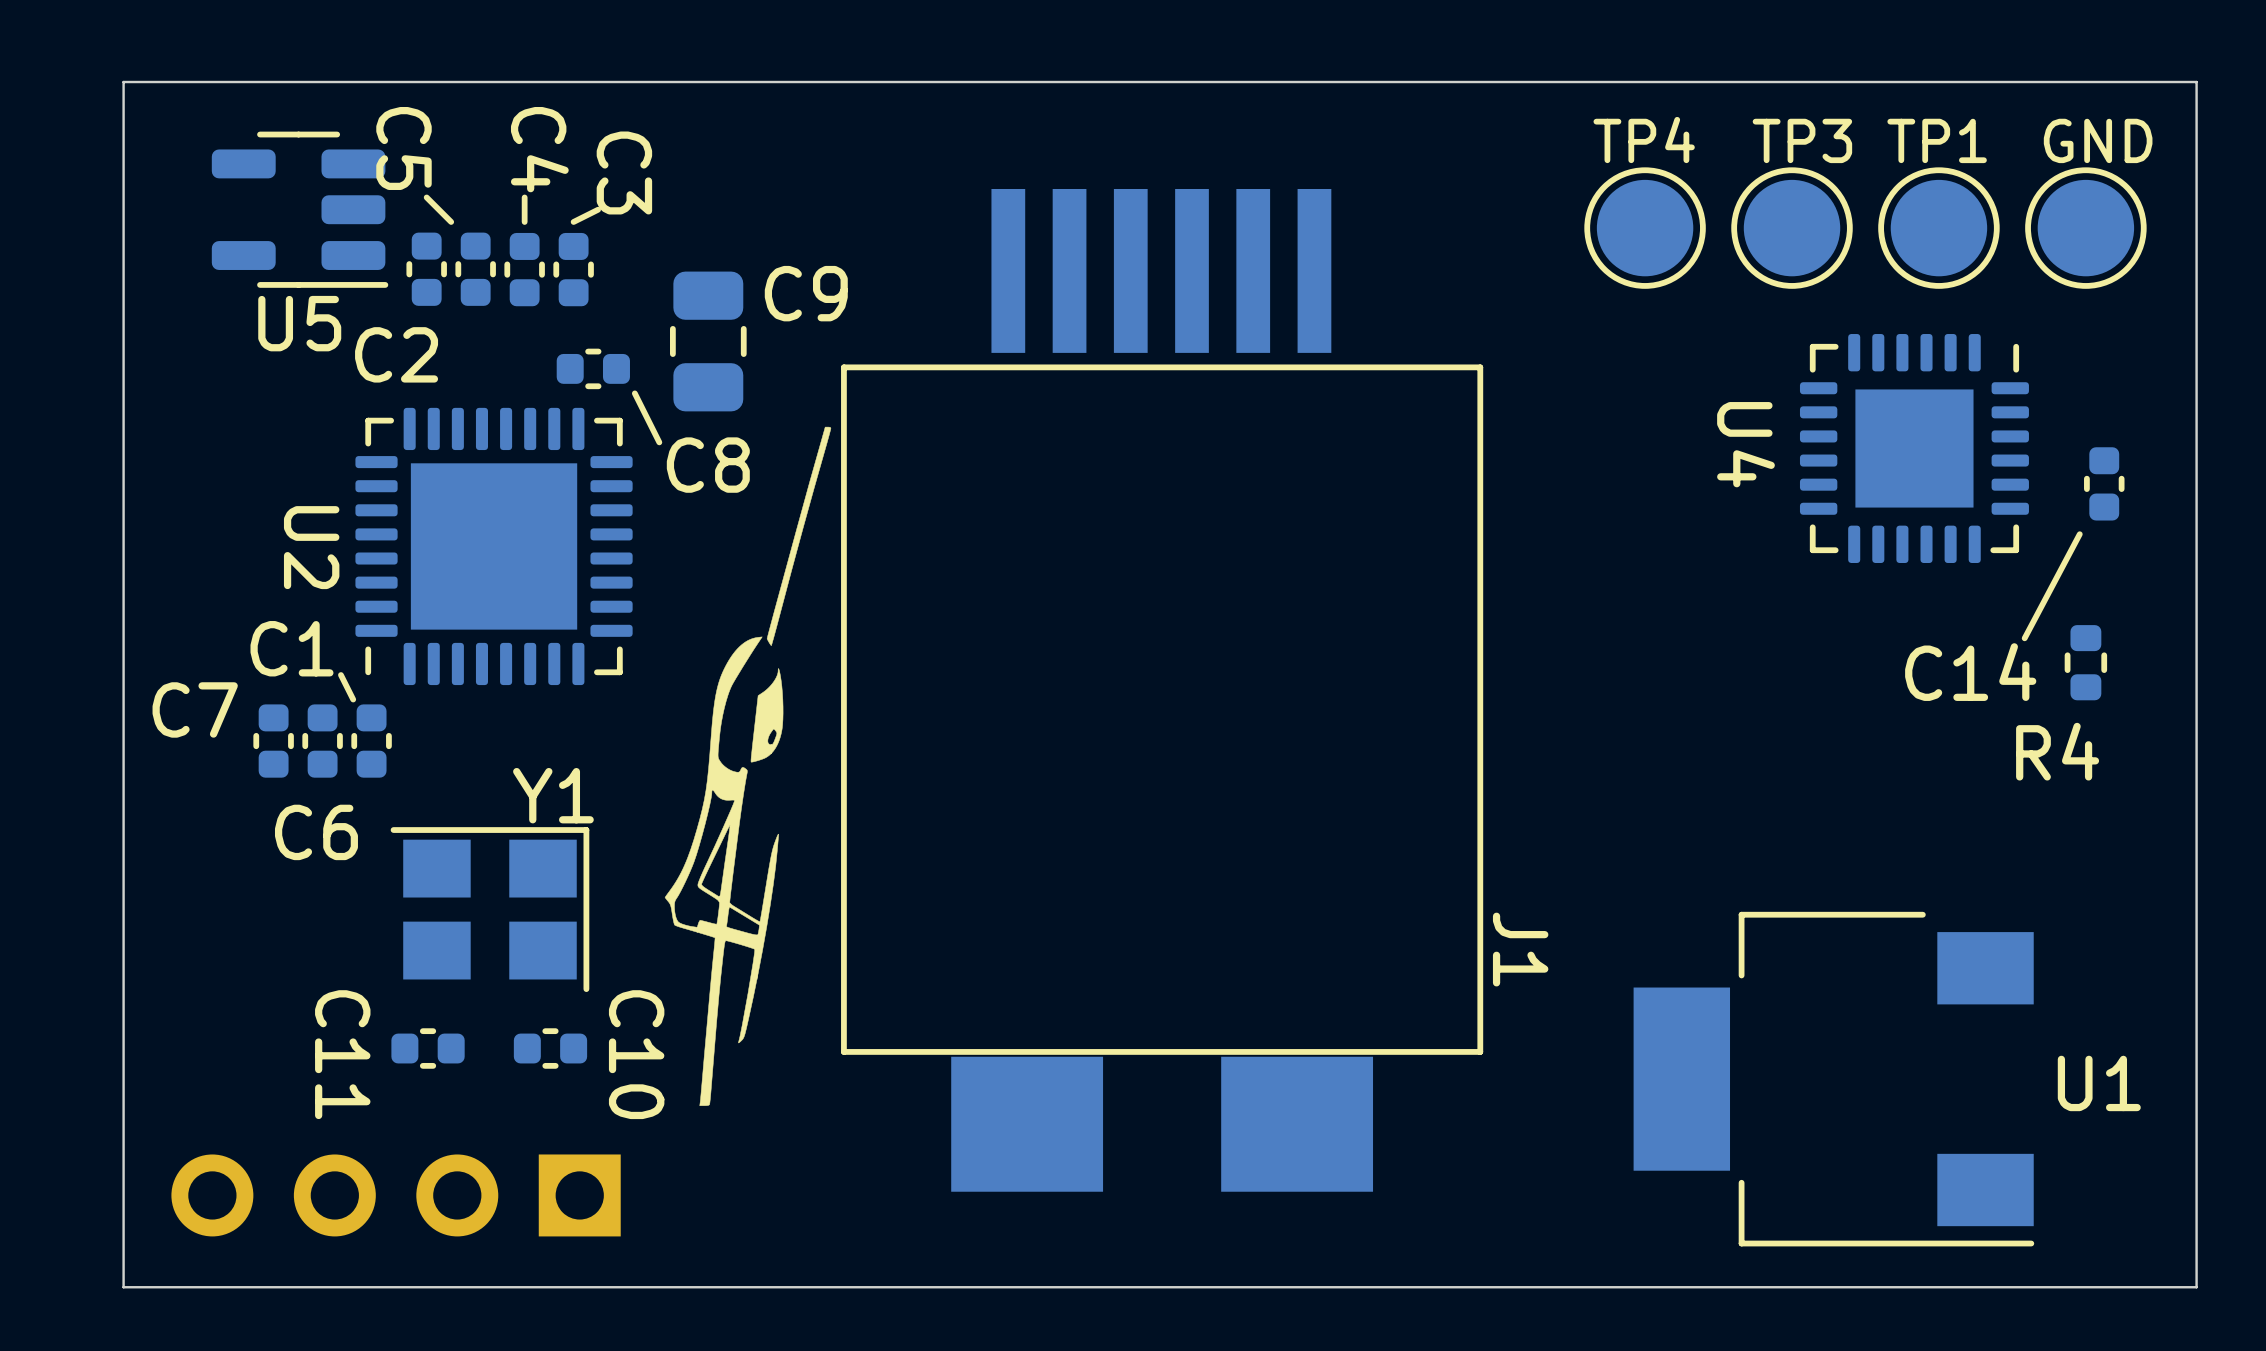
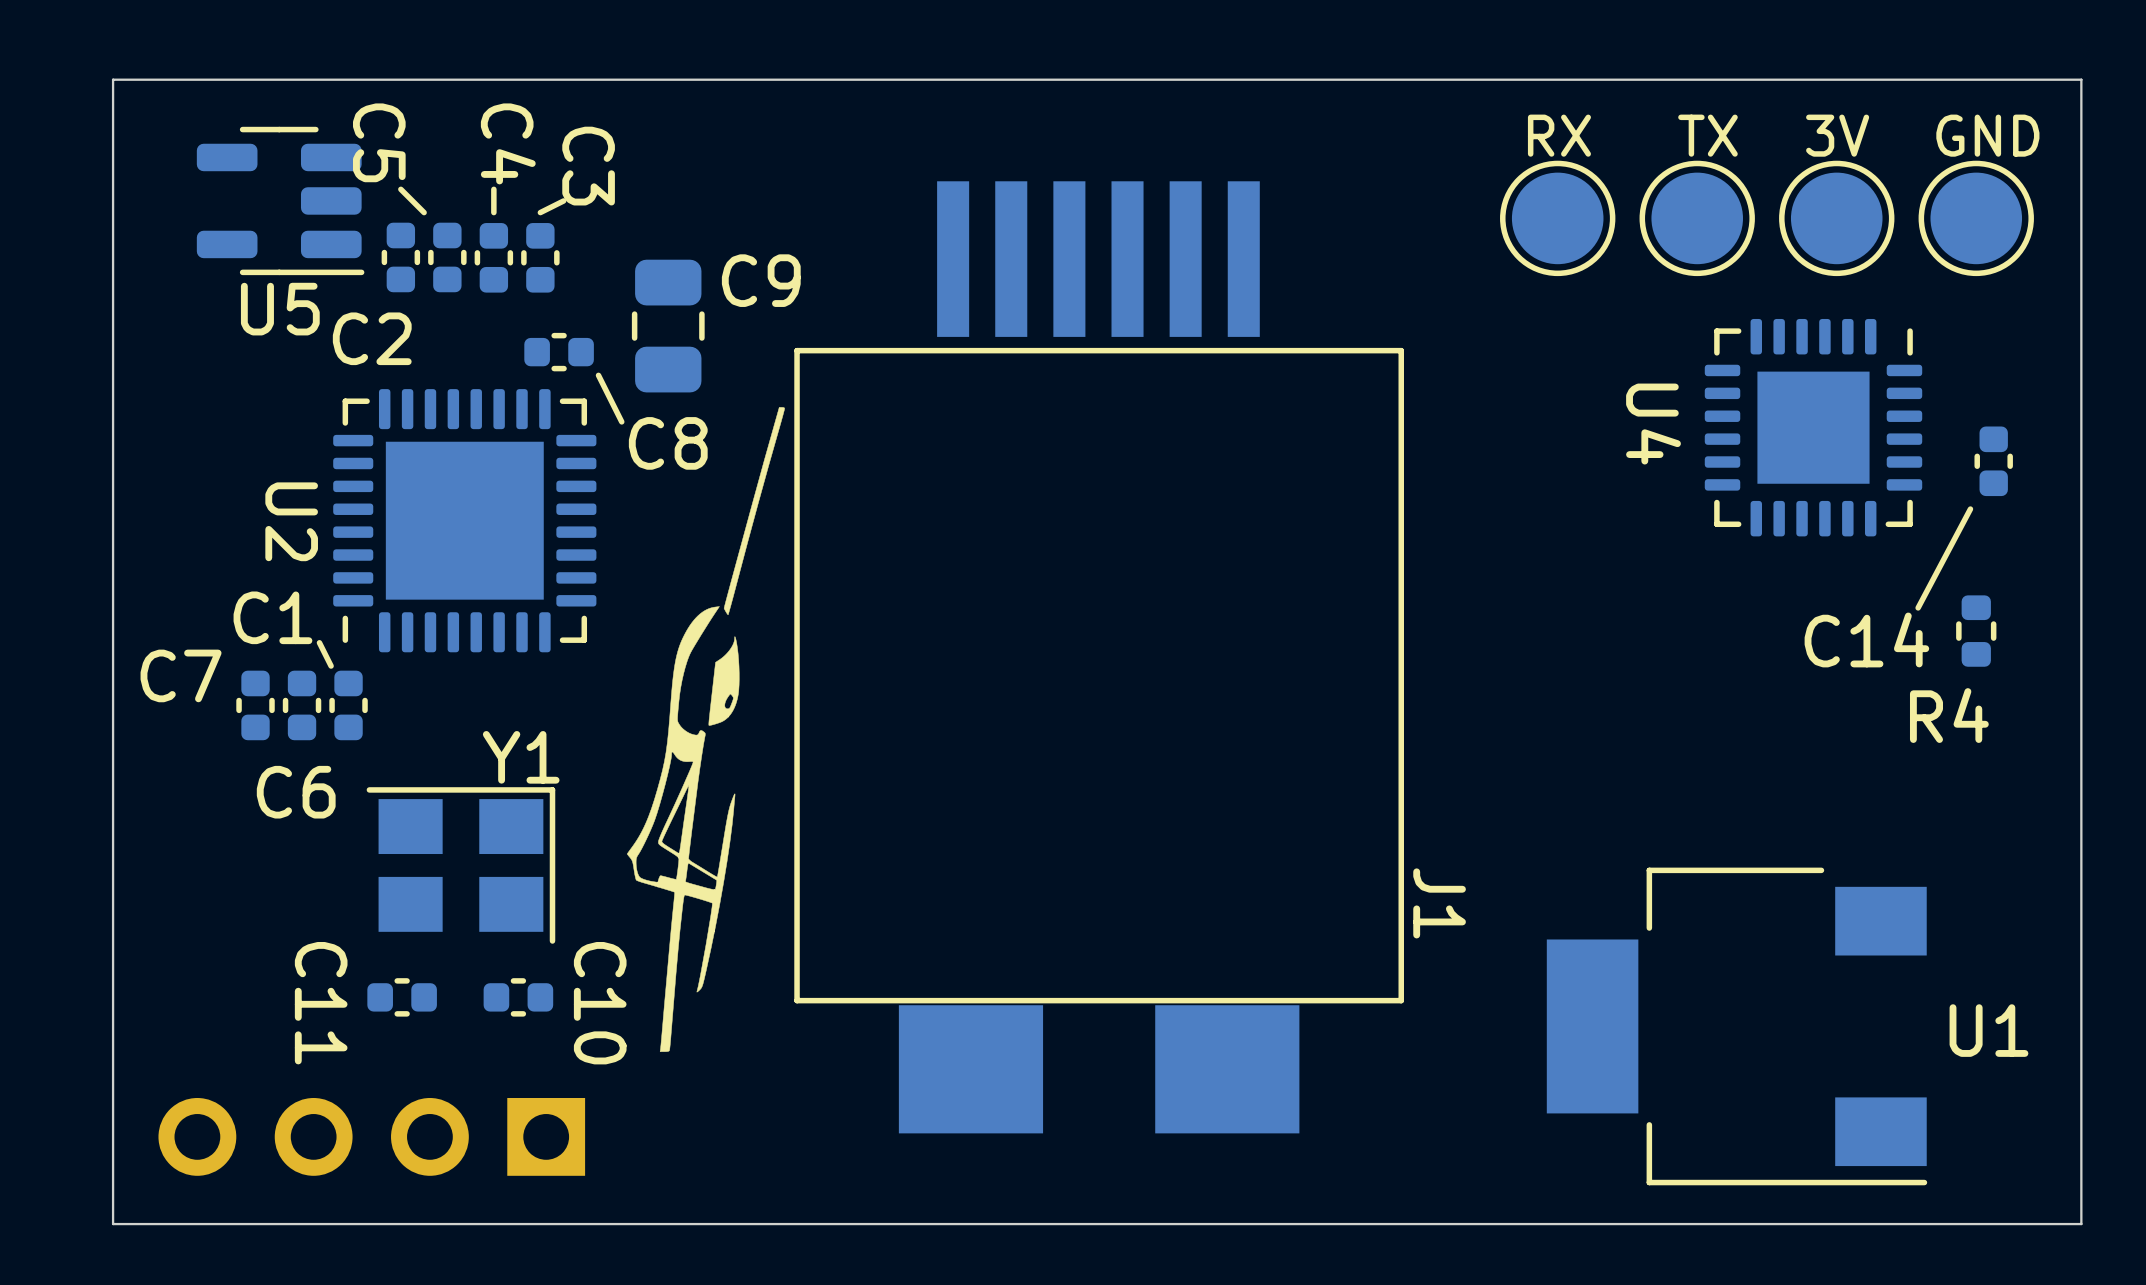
TP4 name: TP4 (1644, 140) -> RX (1559, 135)
TP3 name: TP3 (1802, 140) -> TX (1707, 135)
TP1 name: TP1 (1937, 140) -> 3V (1837, 135)

